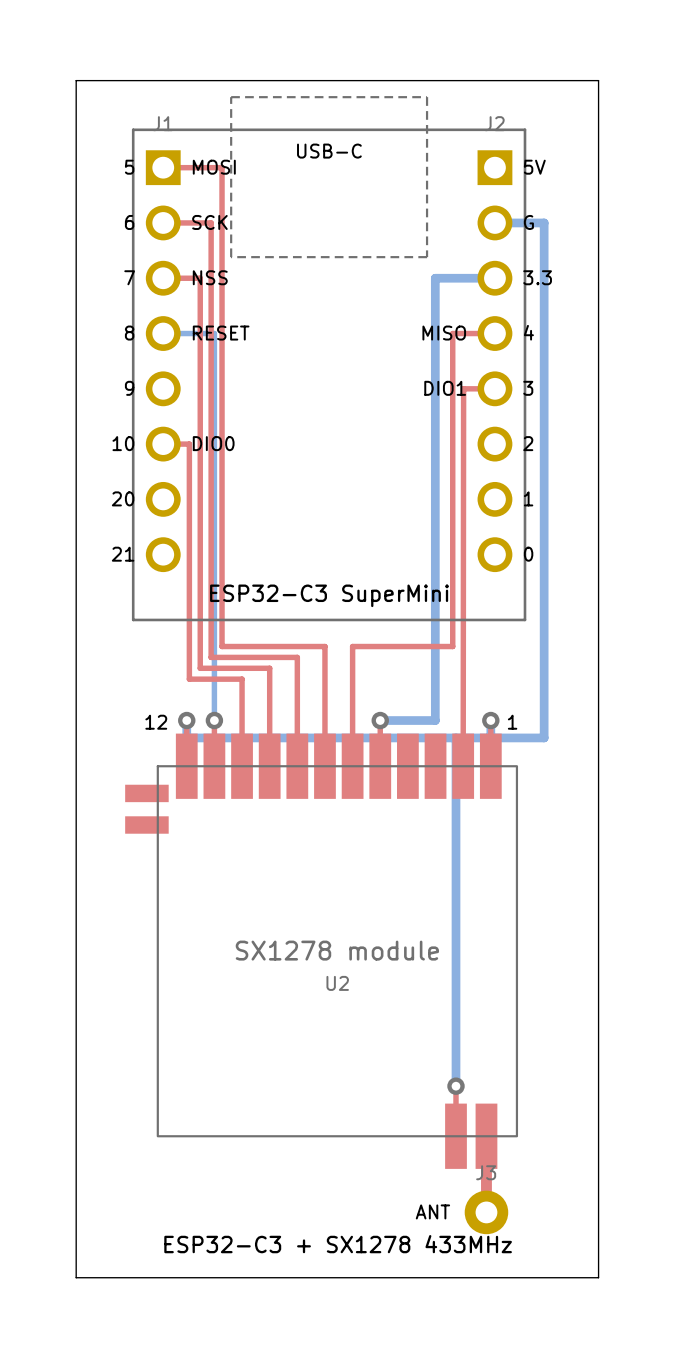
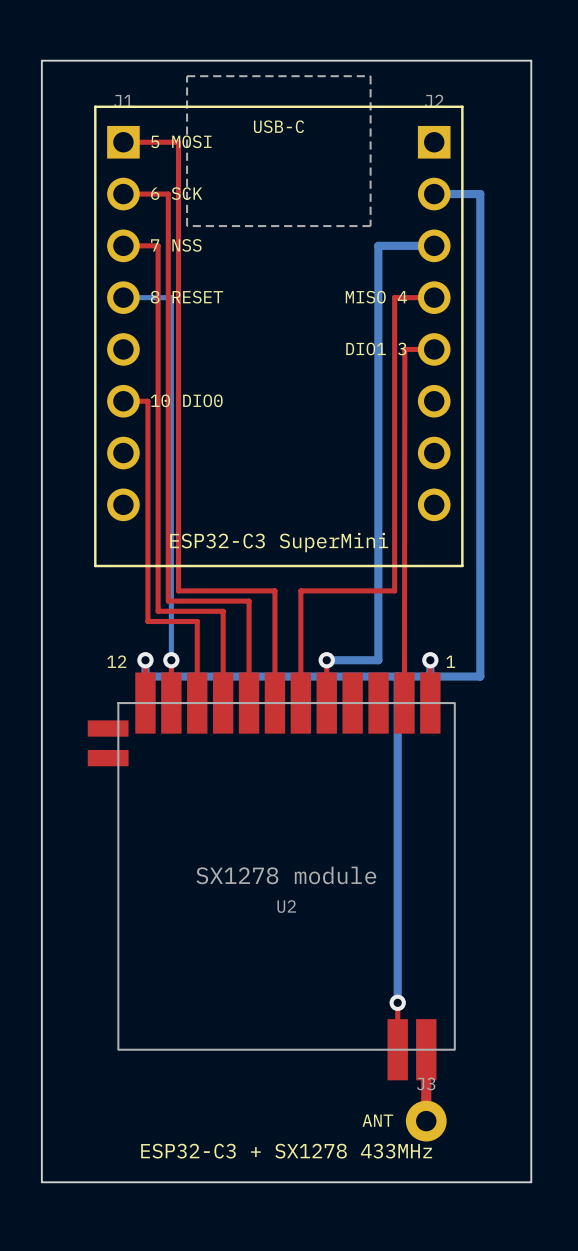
line: (133, 129) (524, 129) (524, 619) (133, 619) (133, 129) -> none
line: none -> (95, 106) (462, 106) (462, 566) (95, 566) (95, 106)
text: 5 (129, 167) -> none
text: MOSI (214, 167) -> 5 MOSI (181, 141)
text: 5V (534, 167) -> none
text: 6 (129, 222) -> none
text: SCK (209, 222) -> 6 SCK (176, 193)
text: G (528, 222) -> none
text: 7 (129, 277) -> none
text: NSS (210, 277) -> 7 NSS (176, 245)
text: 3.3 (537, 277) -> none
text: 4 (528, 332) -> none
text: 8 (129, 333) -> none
text: RESET (221, 333) -> 8 RESET (187, 297)
text: MISO (444, 333) -> MISO 4 (376, 297)
text: 9 (129, 388) -> none
text: DIO1 (445, 388) -> DIO1 3 (376, 348)
text: 3 (528, 388) -> none
text: 10 (123, 443) -> none
text: DIO0 (213, 443) -> 10 DIO0 (186, 400)
text: 2 (528, 443) -> none
text: 20 (123, 498) -> none
text: 1 (528, 498) -> none
text: 21 (123, 554) -> none
text: 0 (528, 554) -> none

